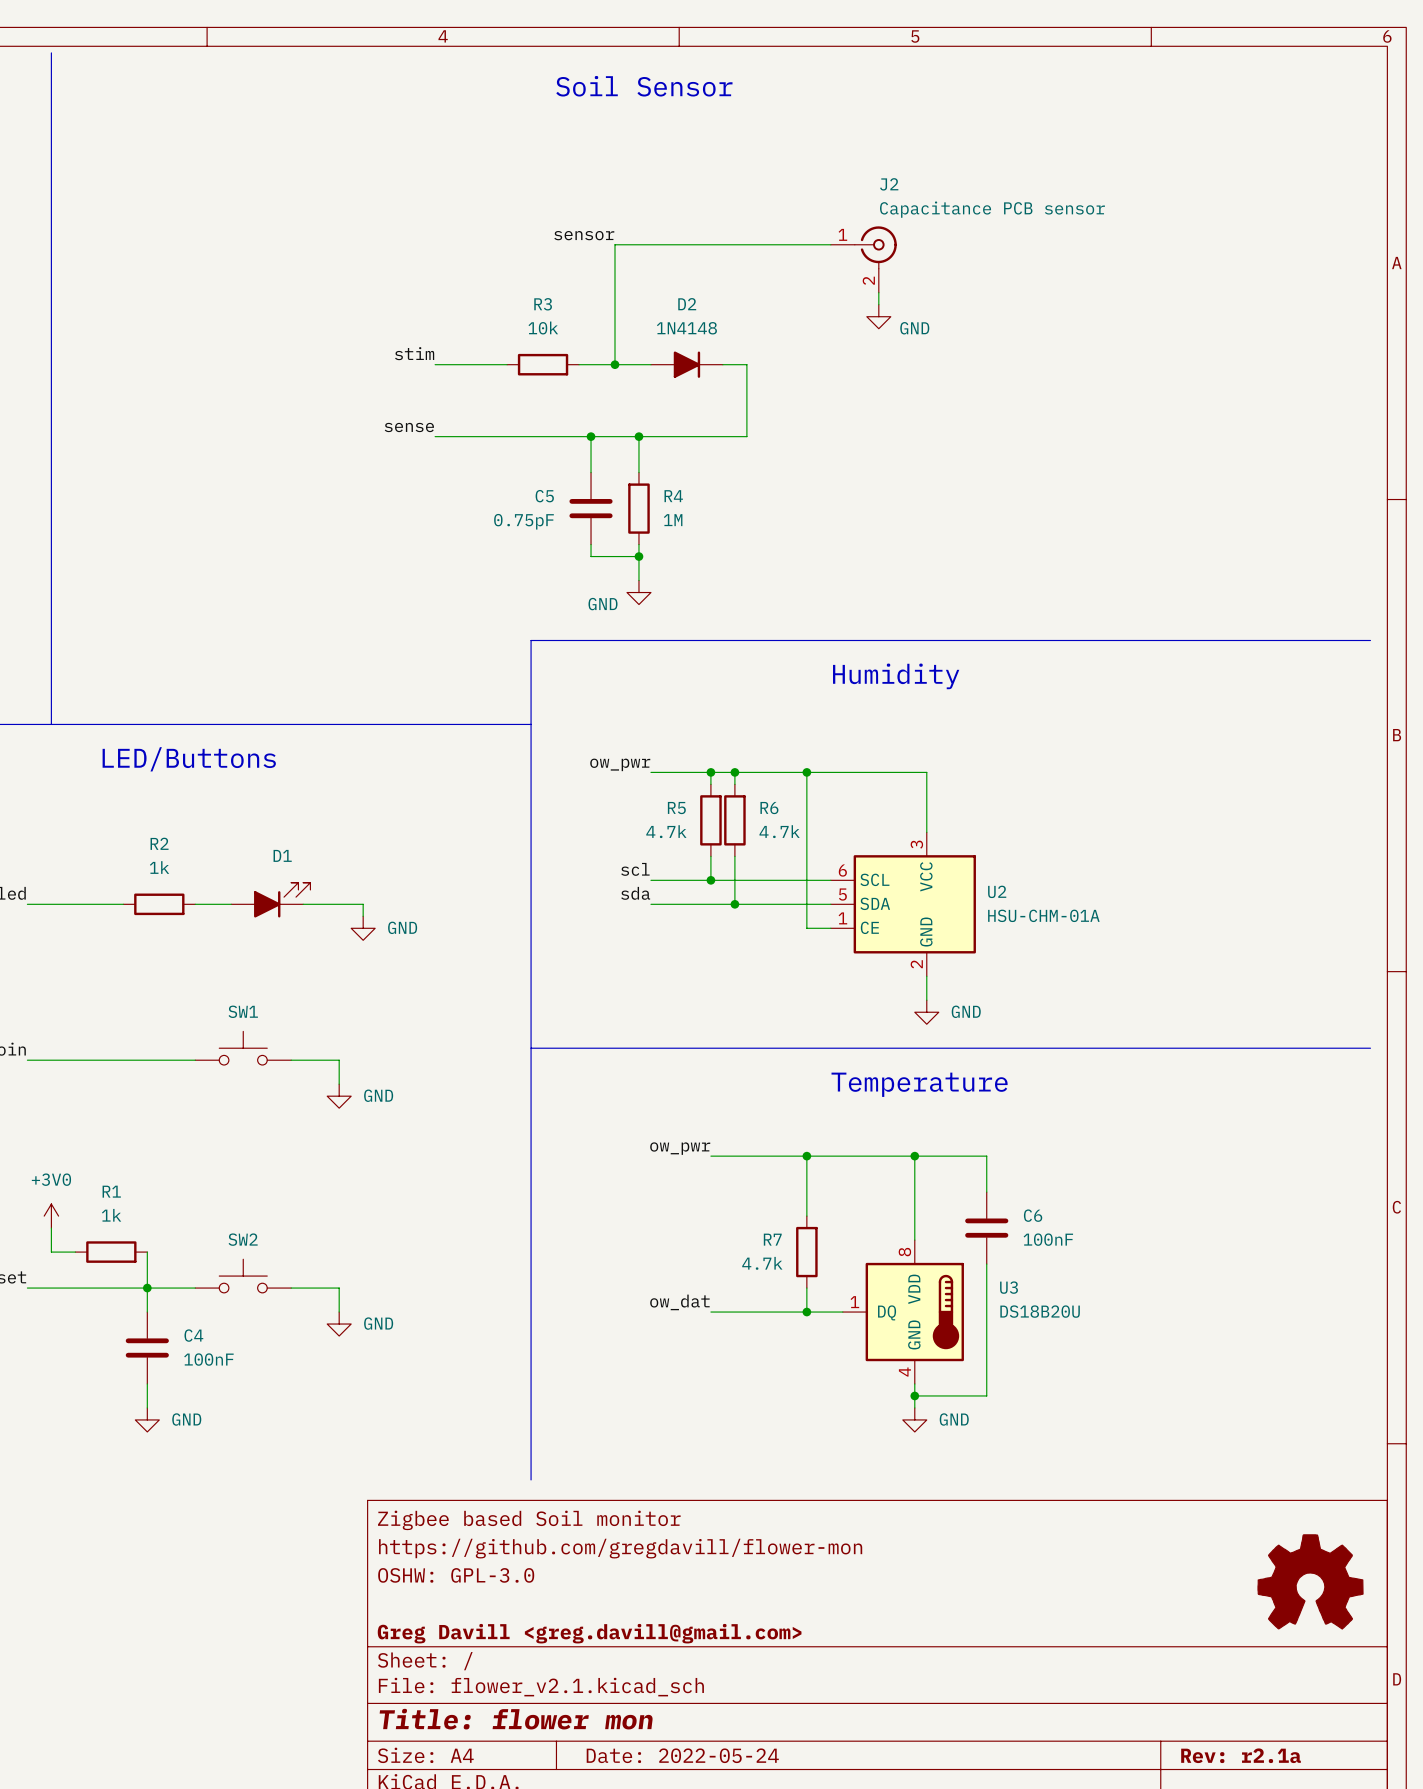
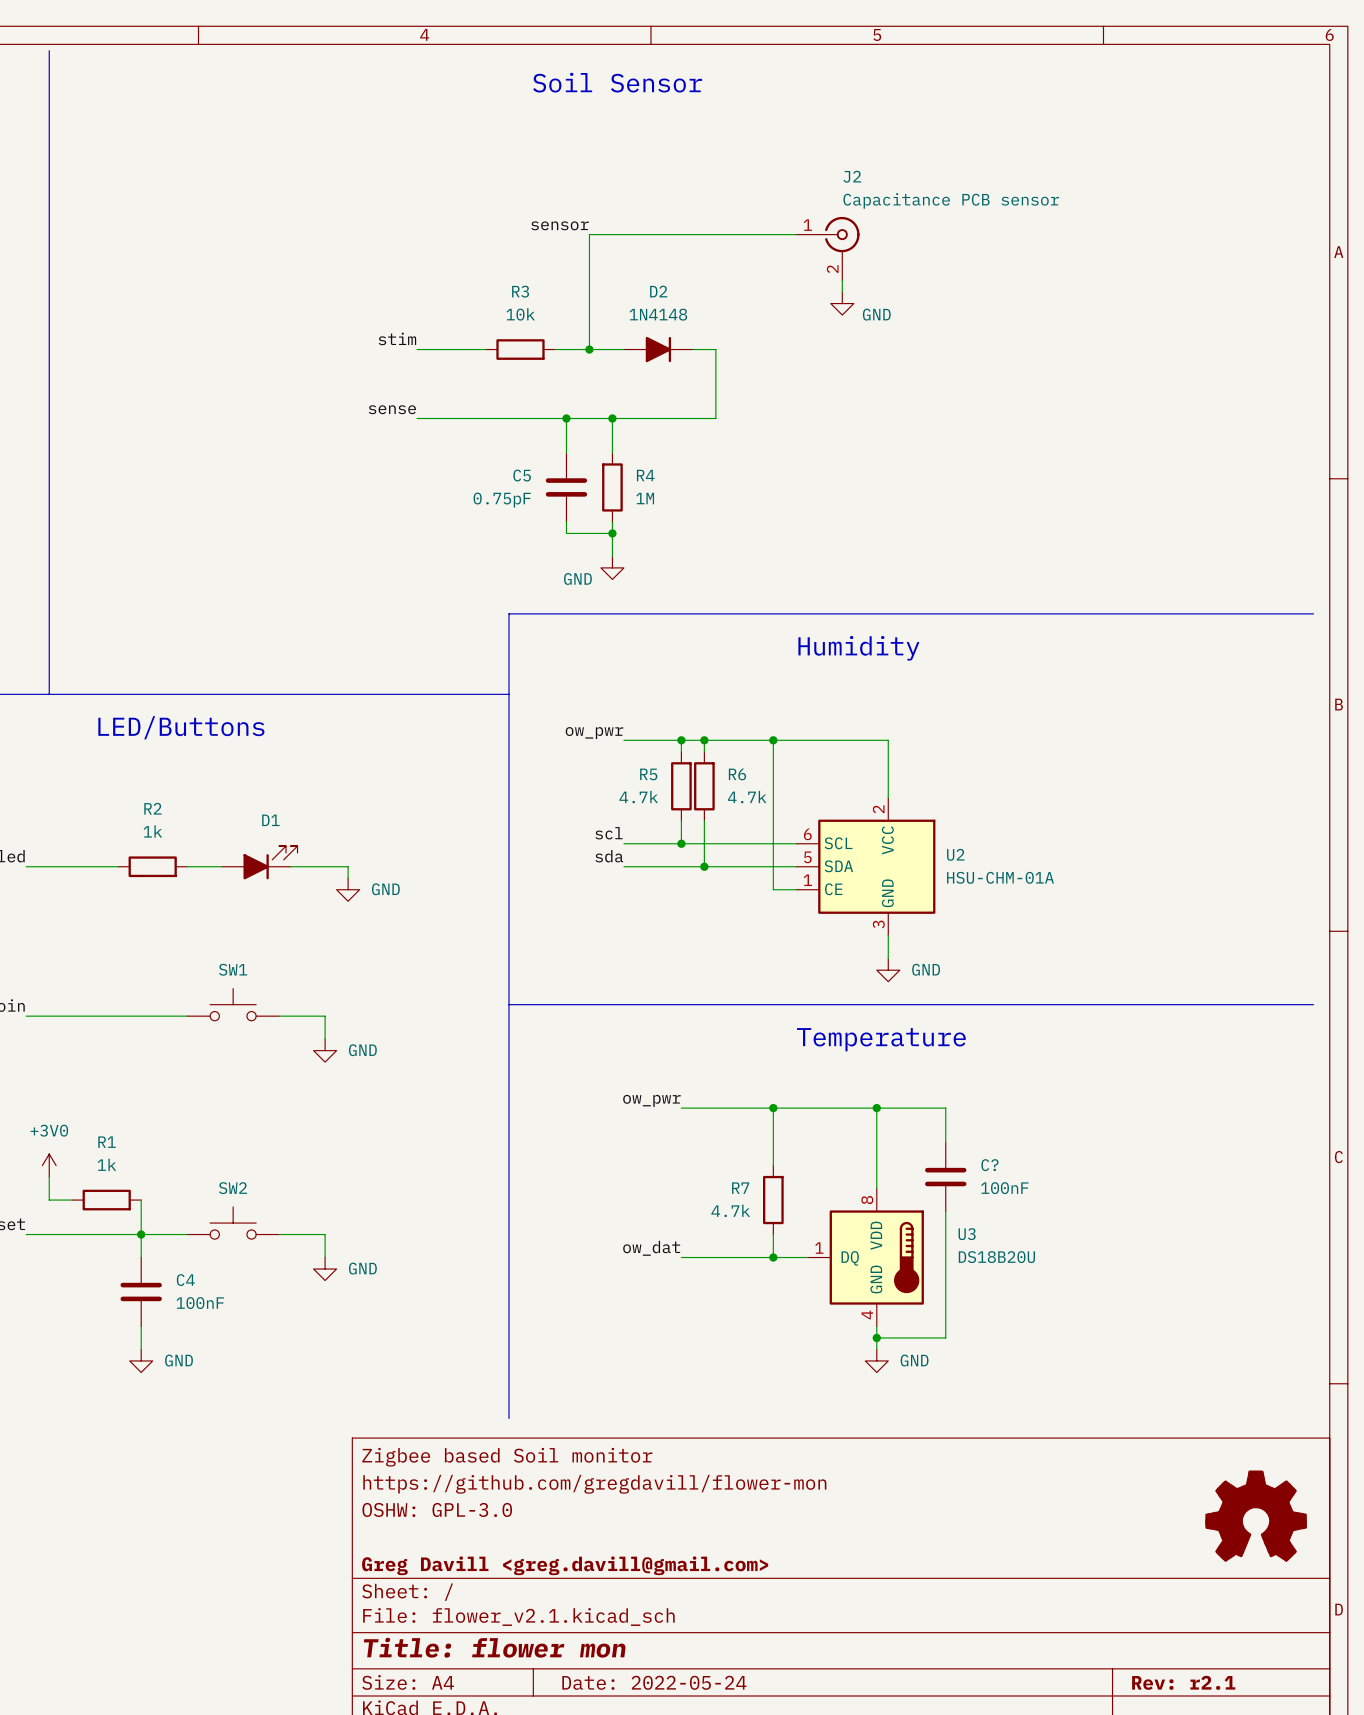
U2 pin number: 3 (916, 844) -> 2 (878, 809)
U2 pin number: 2 (916, 964) -> 3 (878, 924)
C6 name: C6 (1033, 1215) -> C? (989, 1165)
title block: Rev: r2.1a (1241, 1755) -> Rev: r2.1 (1183, 1682)

